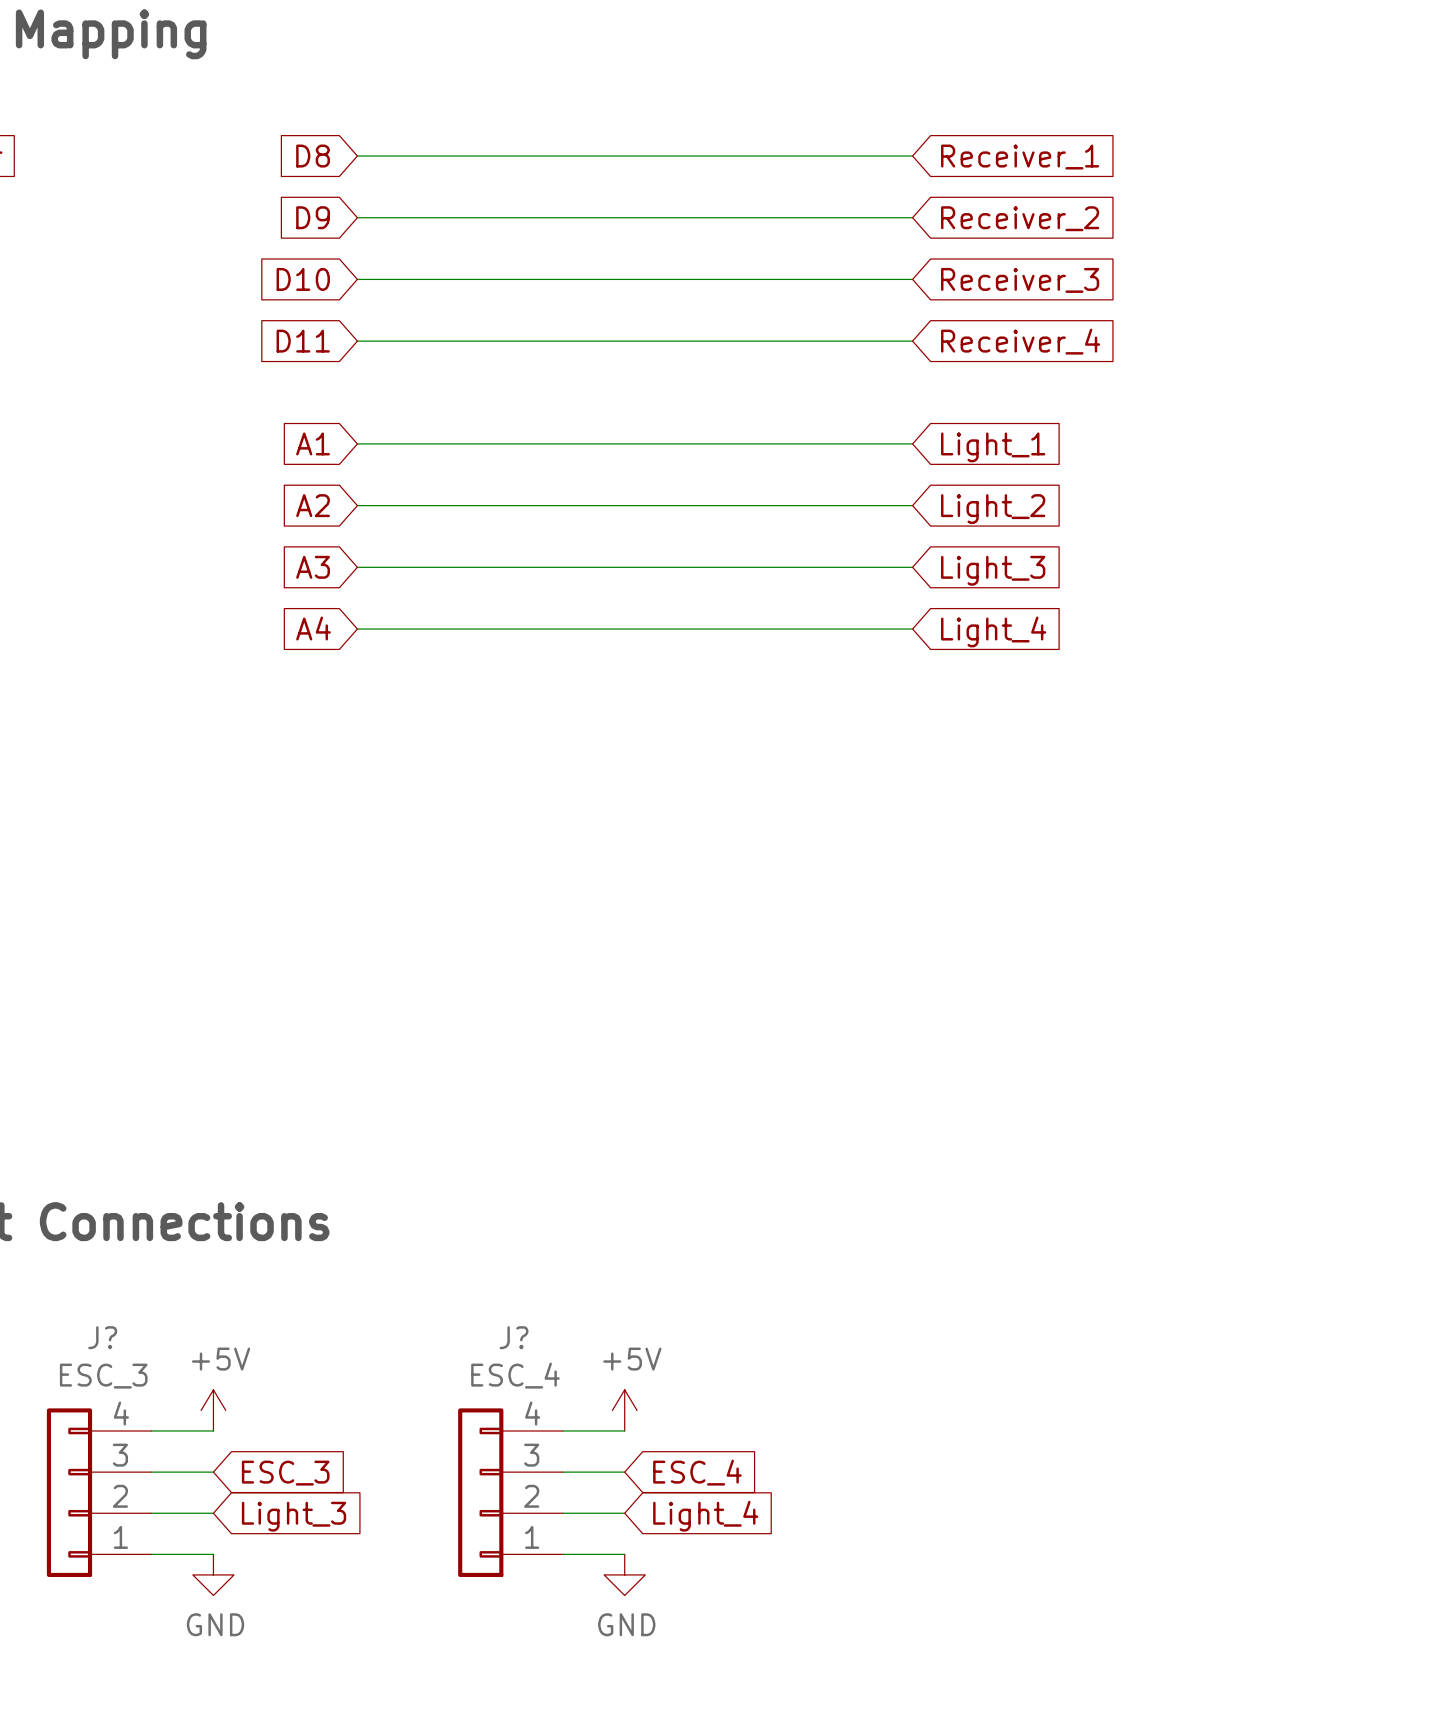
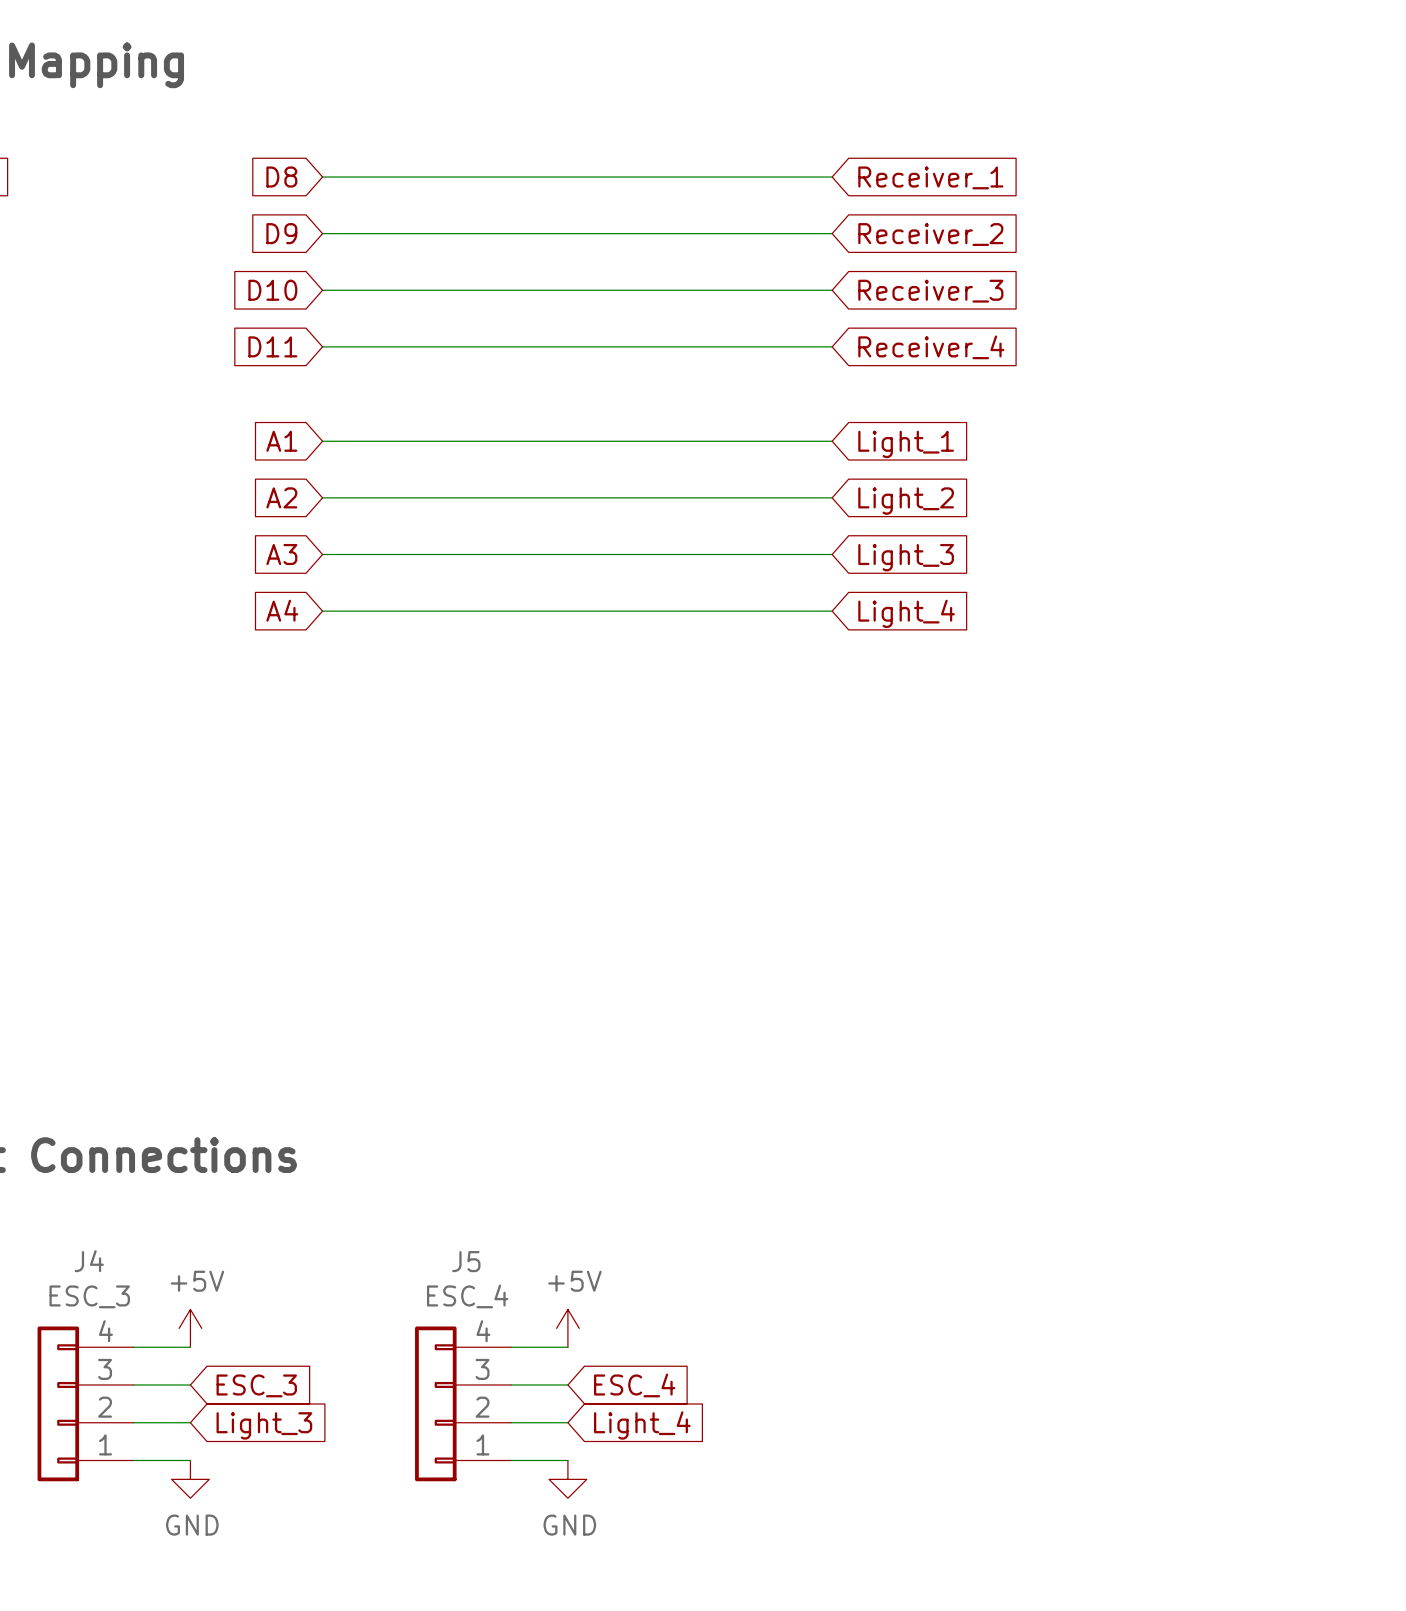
J? name: J? (102, 1337) -> J4 (89, 1261)
J? name: J? (514, 1337) -> J5 (466, 1261)

